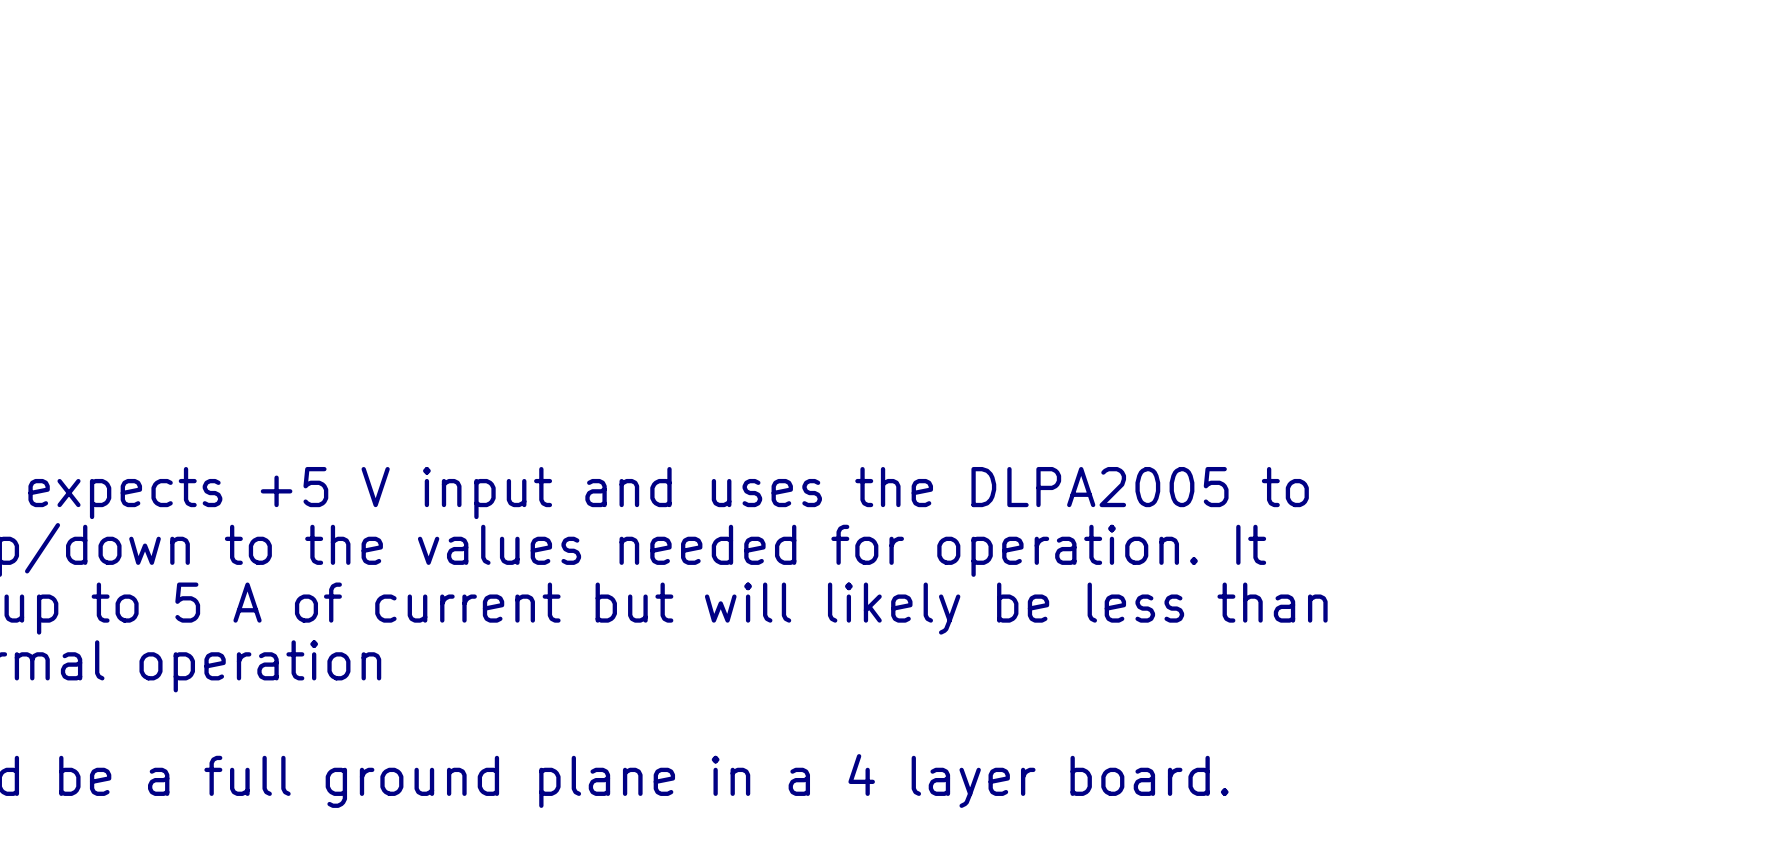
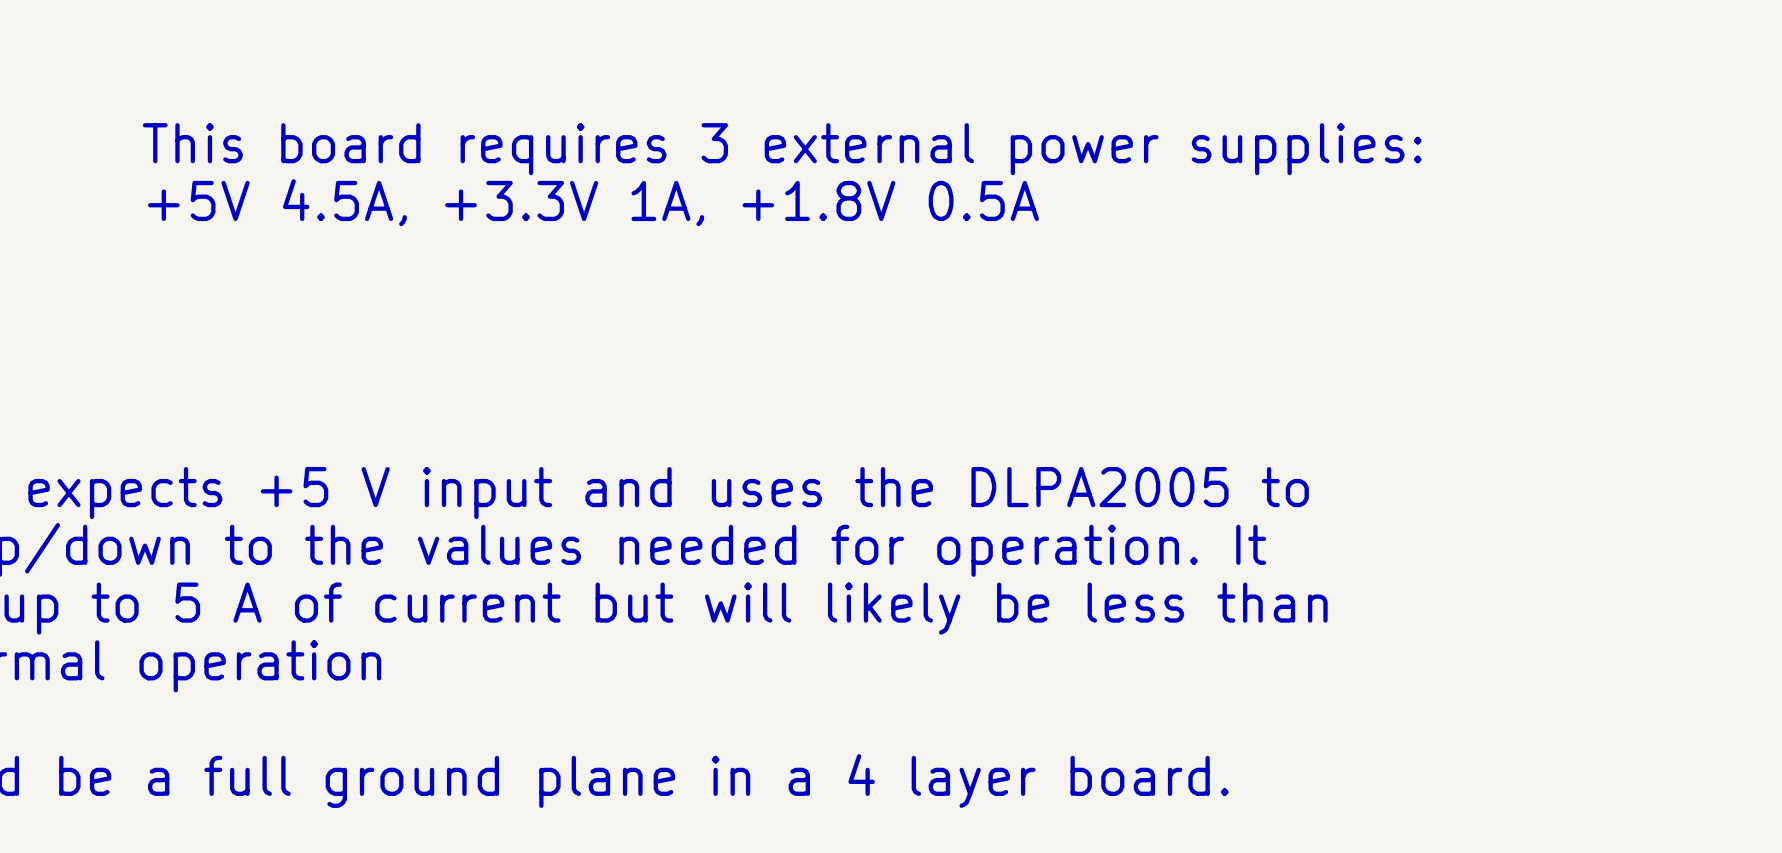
text: none -> This board requires 3 external power supplies: (782, 149)
text: none -> +5V 4.5A, +3.3V 1A, +1.8V 0.5A (593, 202)

